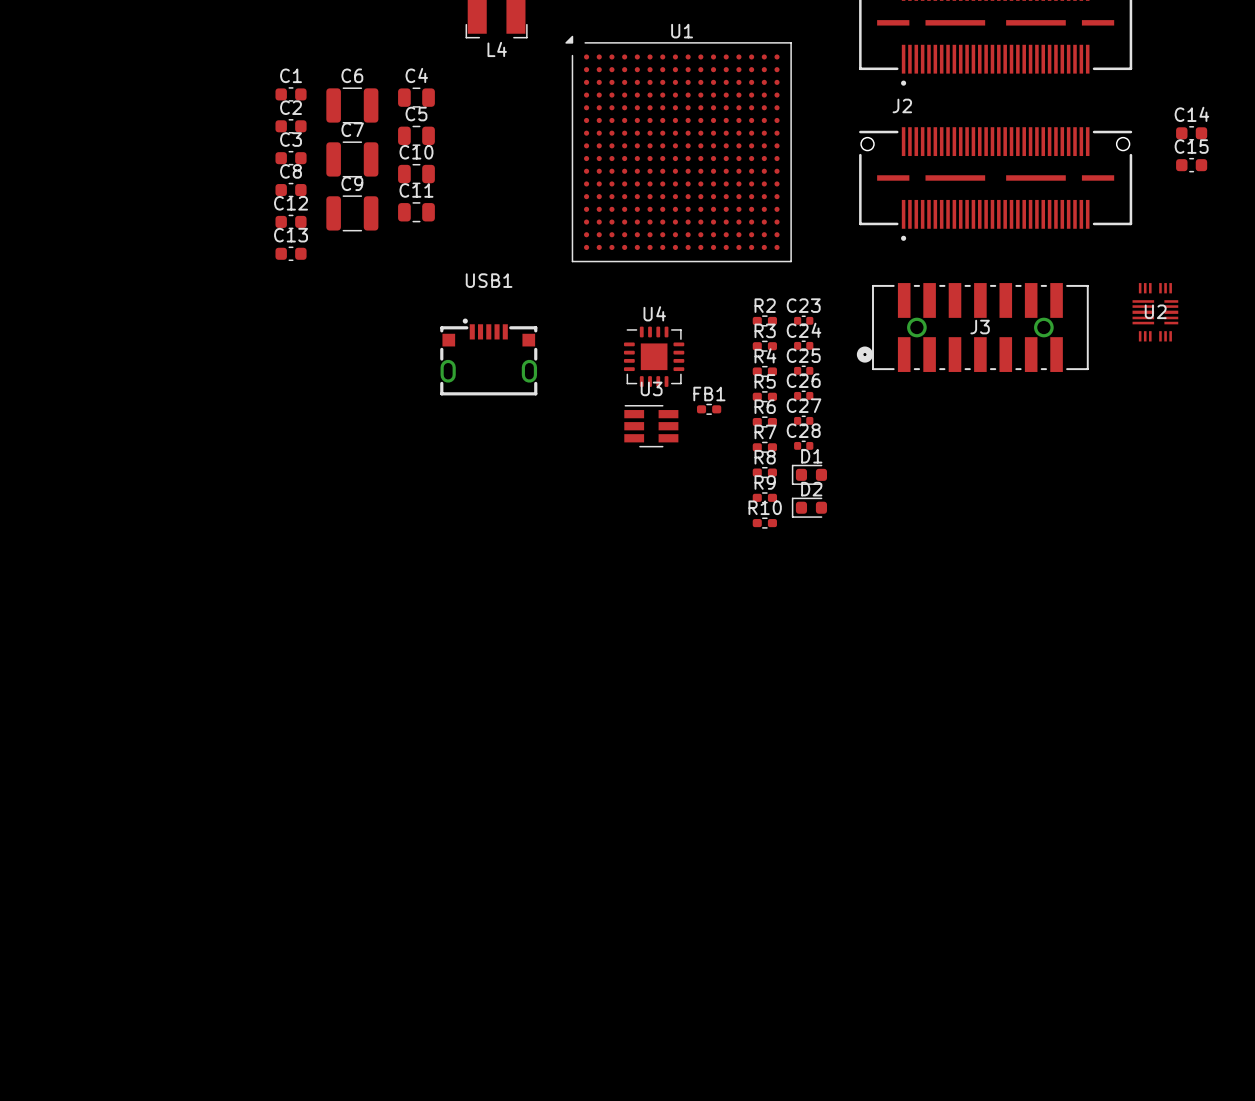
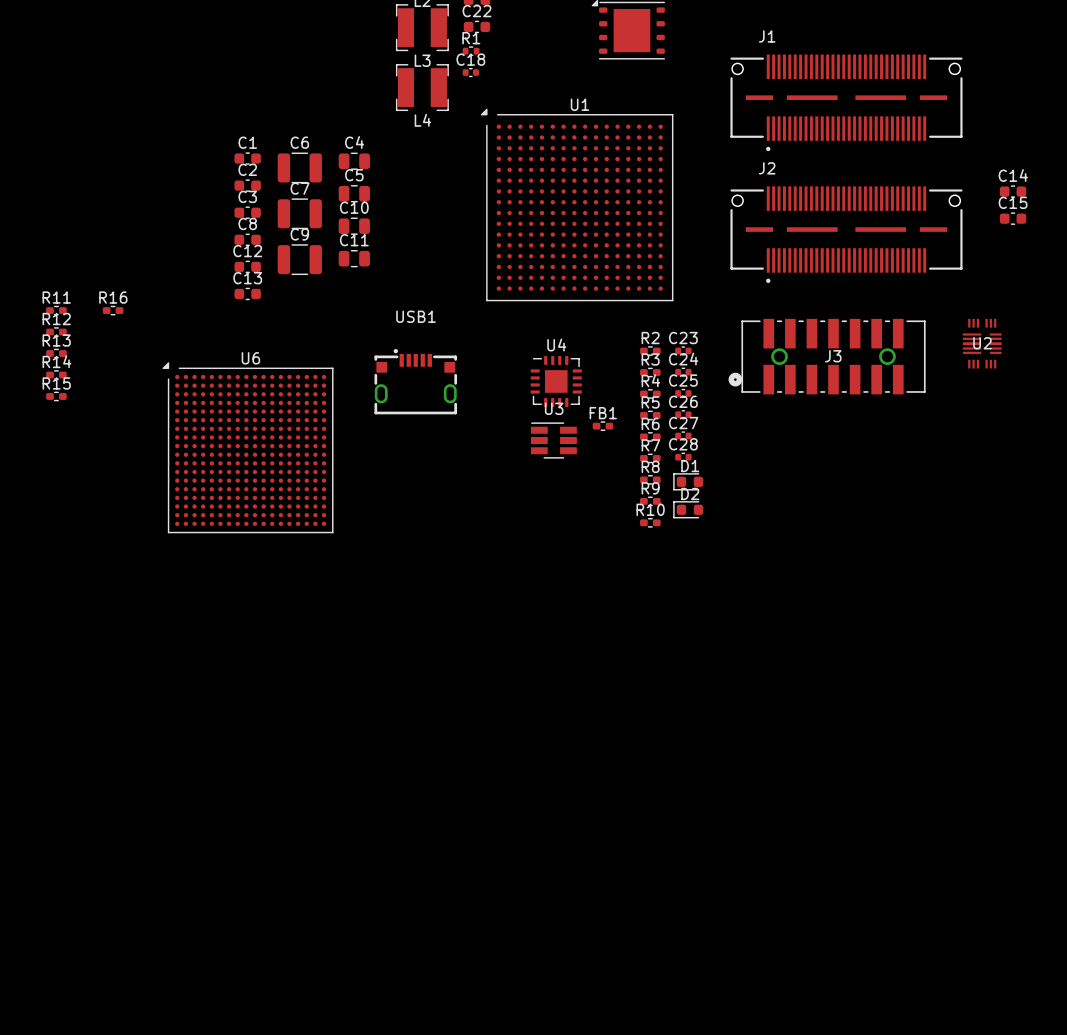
R11: none -> (56, 310)
R16: none -> (113, 310)
R12: none -> (56, 332)
R13: none -> (56, 353)
R14: none -> (56, 375)
R15: none -> (56, 396)
U6: none -> (247, 447)

